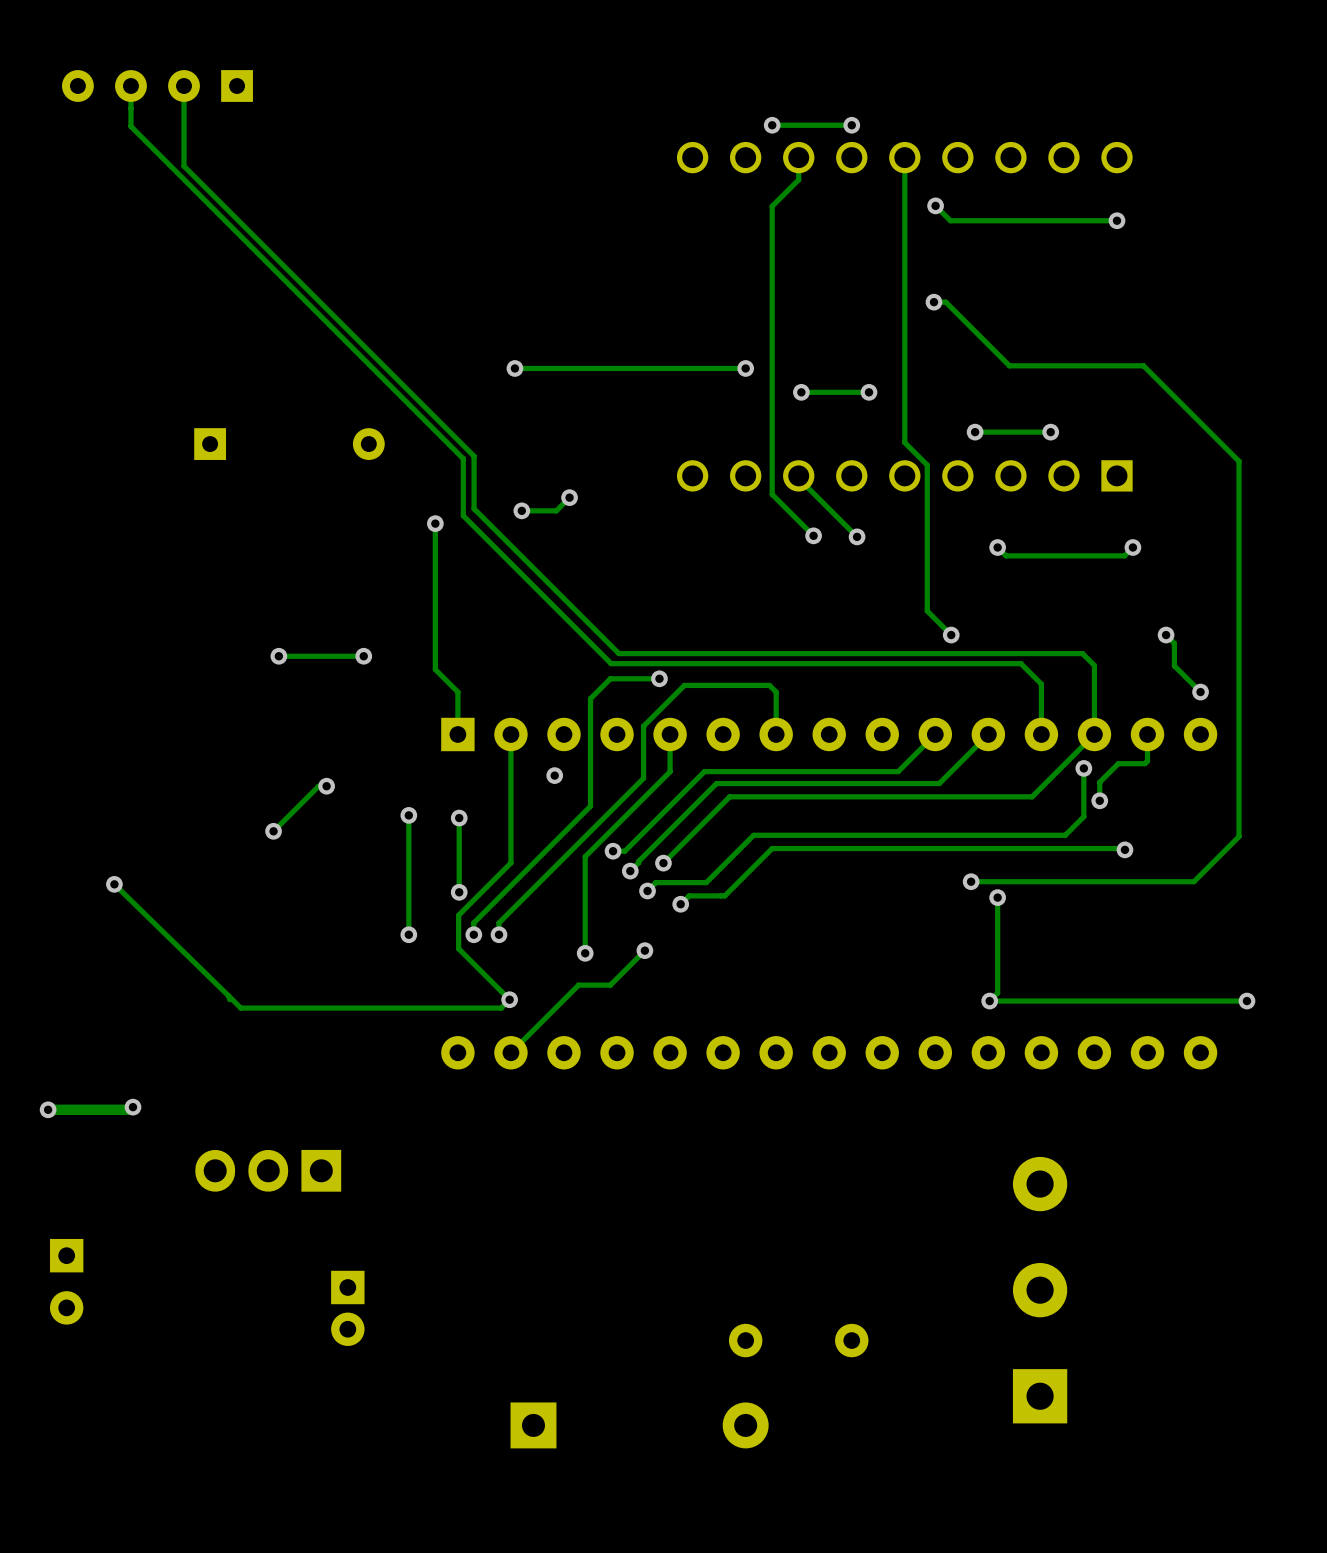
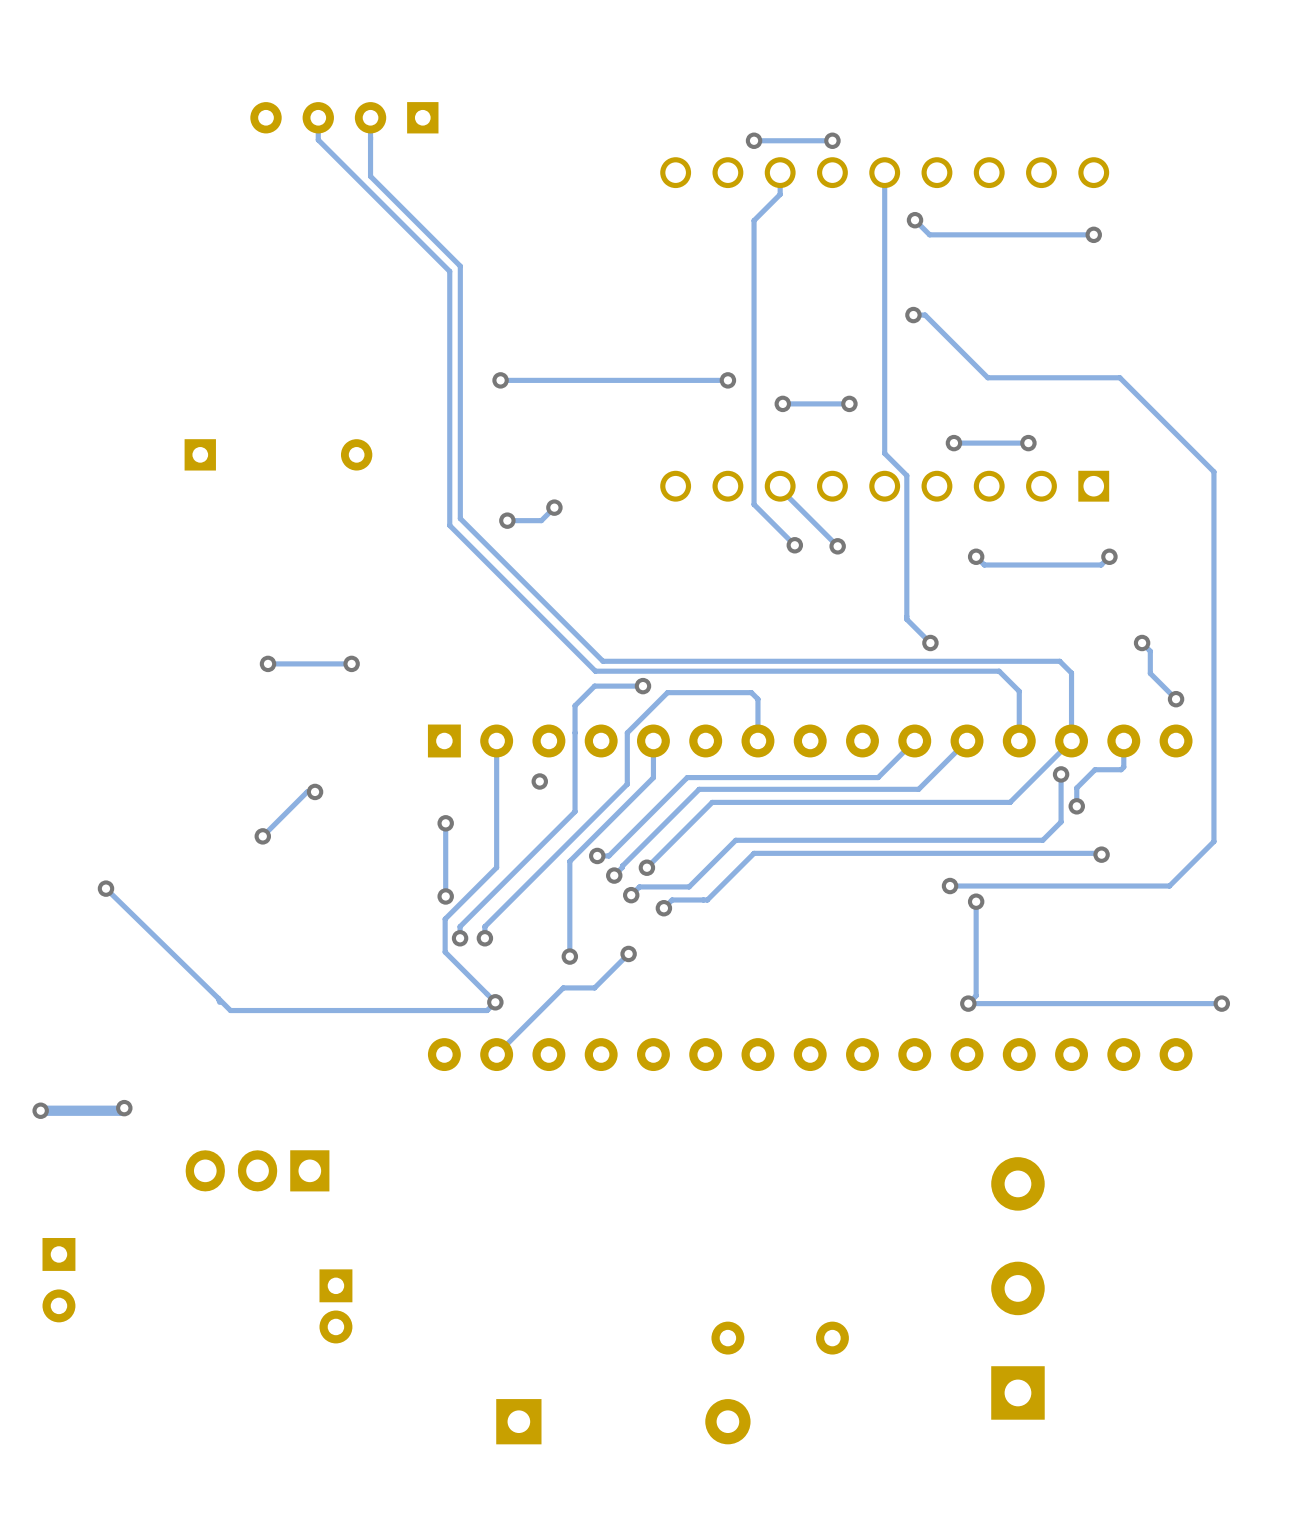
track: (130, 86) (130, 126) (463, 458) -> (318, 117) (318, 139) (449, 271) (449, 469)
part position: (157, 86) -> (344, 117)
track: (184, 86) (184, 166) (474, 456) -> (370, 117) (370, 176) (460, 266) (460, 466)
track: (435, 523) (435, 669) (457, 692) (457, 734) -> none
via: (435, 523) -> none
track: (408, 815) (408, 934) -> none
via: (408, 815) -> none
via: (408, 934) -> none

